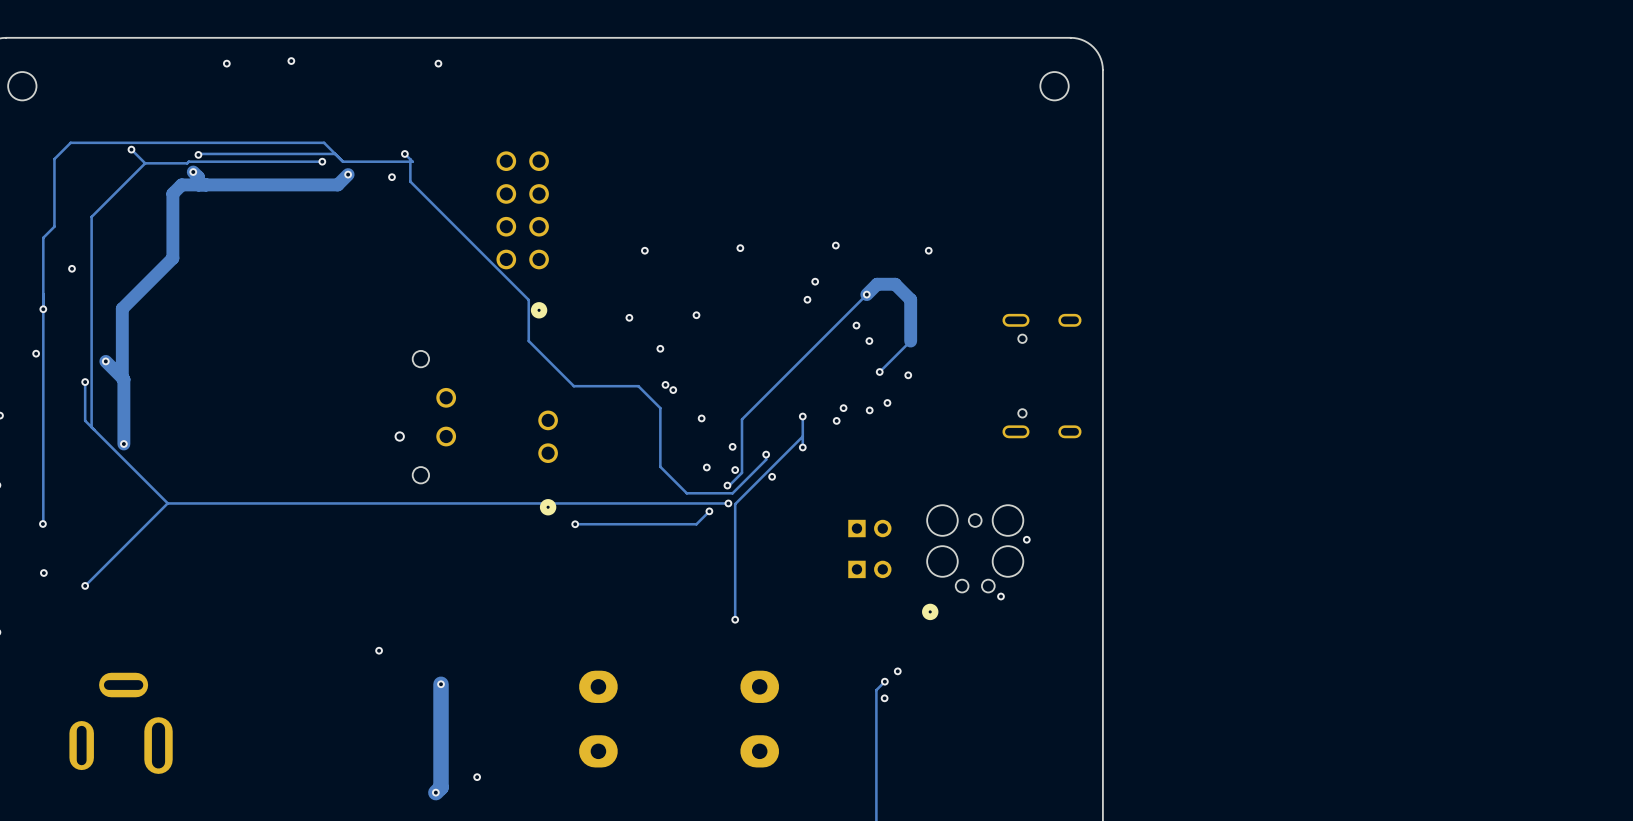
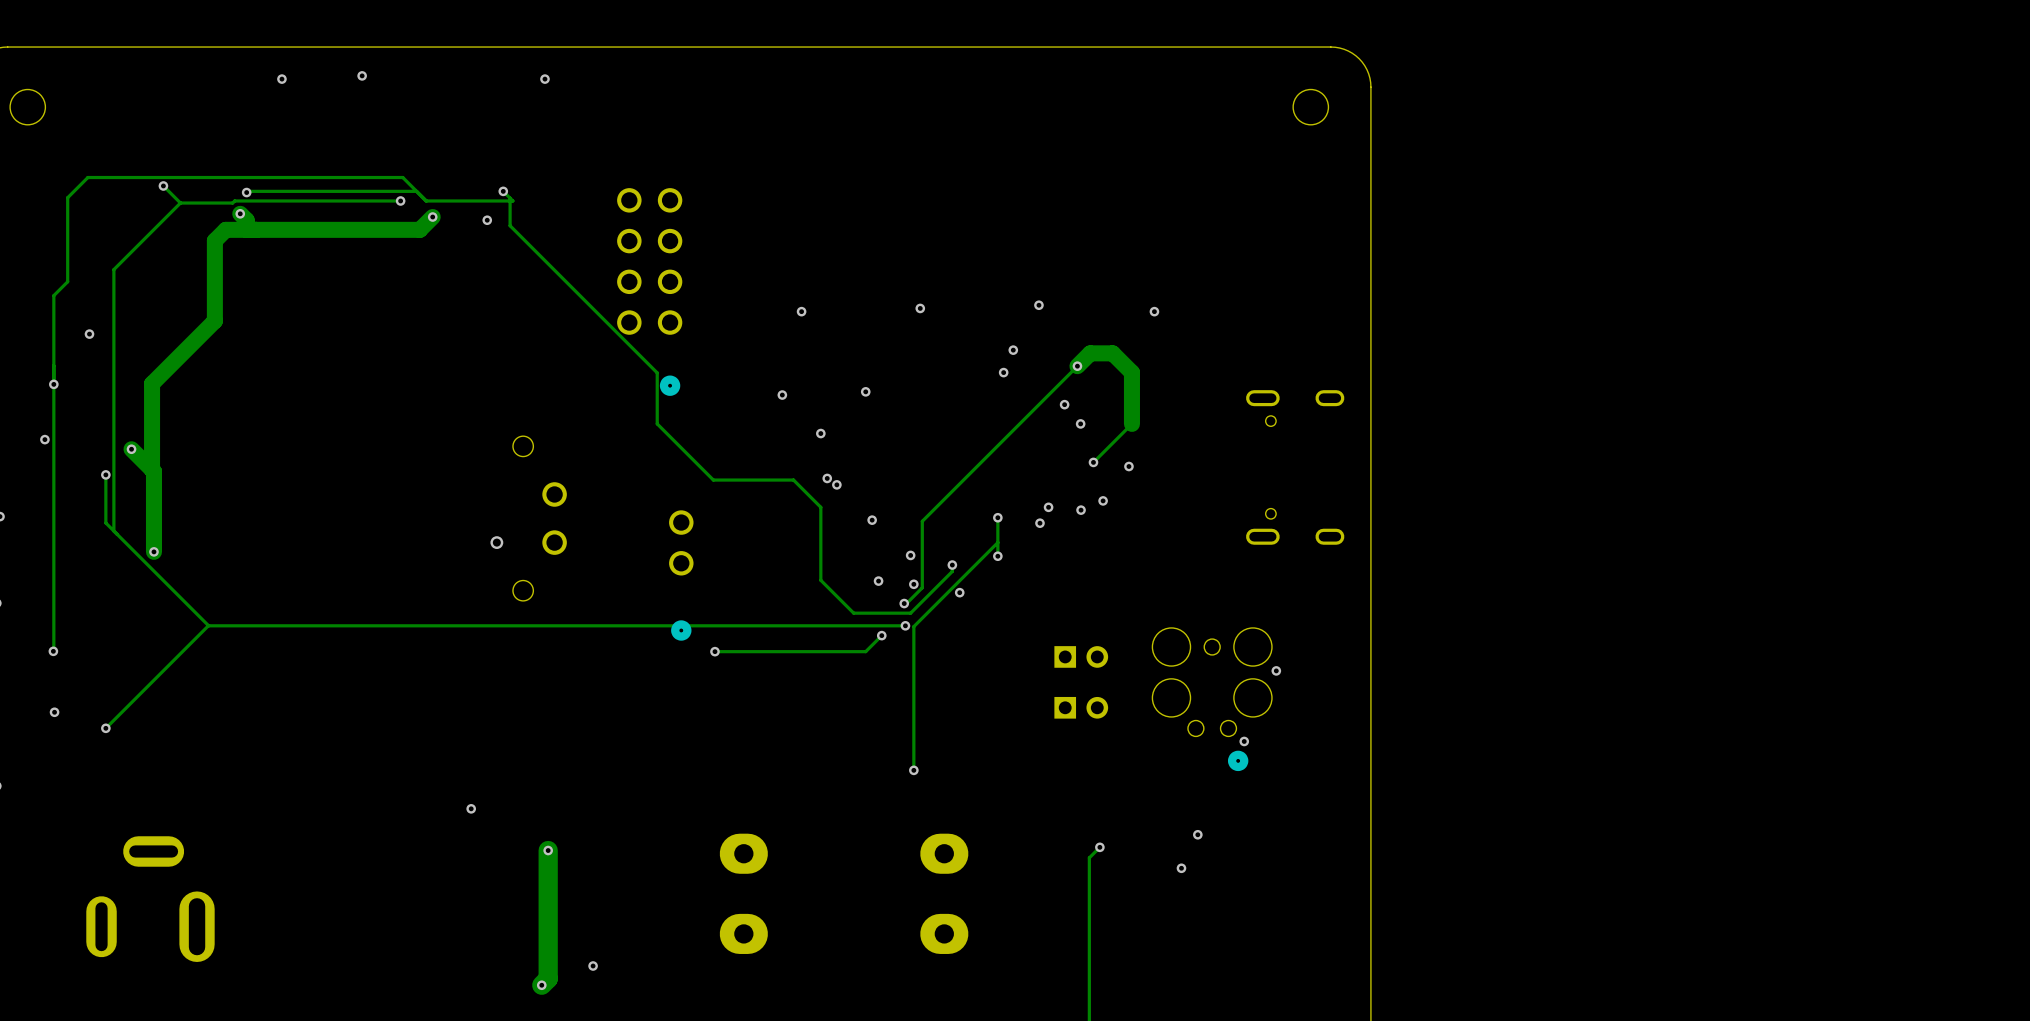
part position: (930, 611) -> (1238, 760)
via: (897, 671) -> none
via: none -> (1197, 834)
via: (884, 698) -> none
via: none -> (1181, 868)

